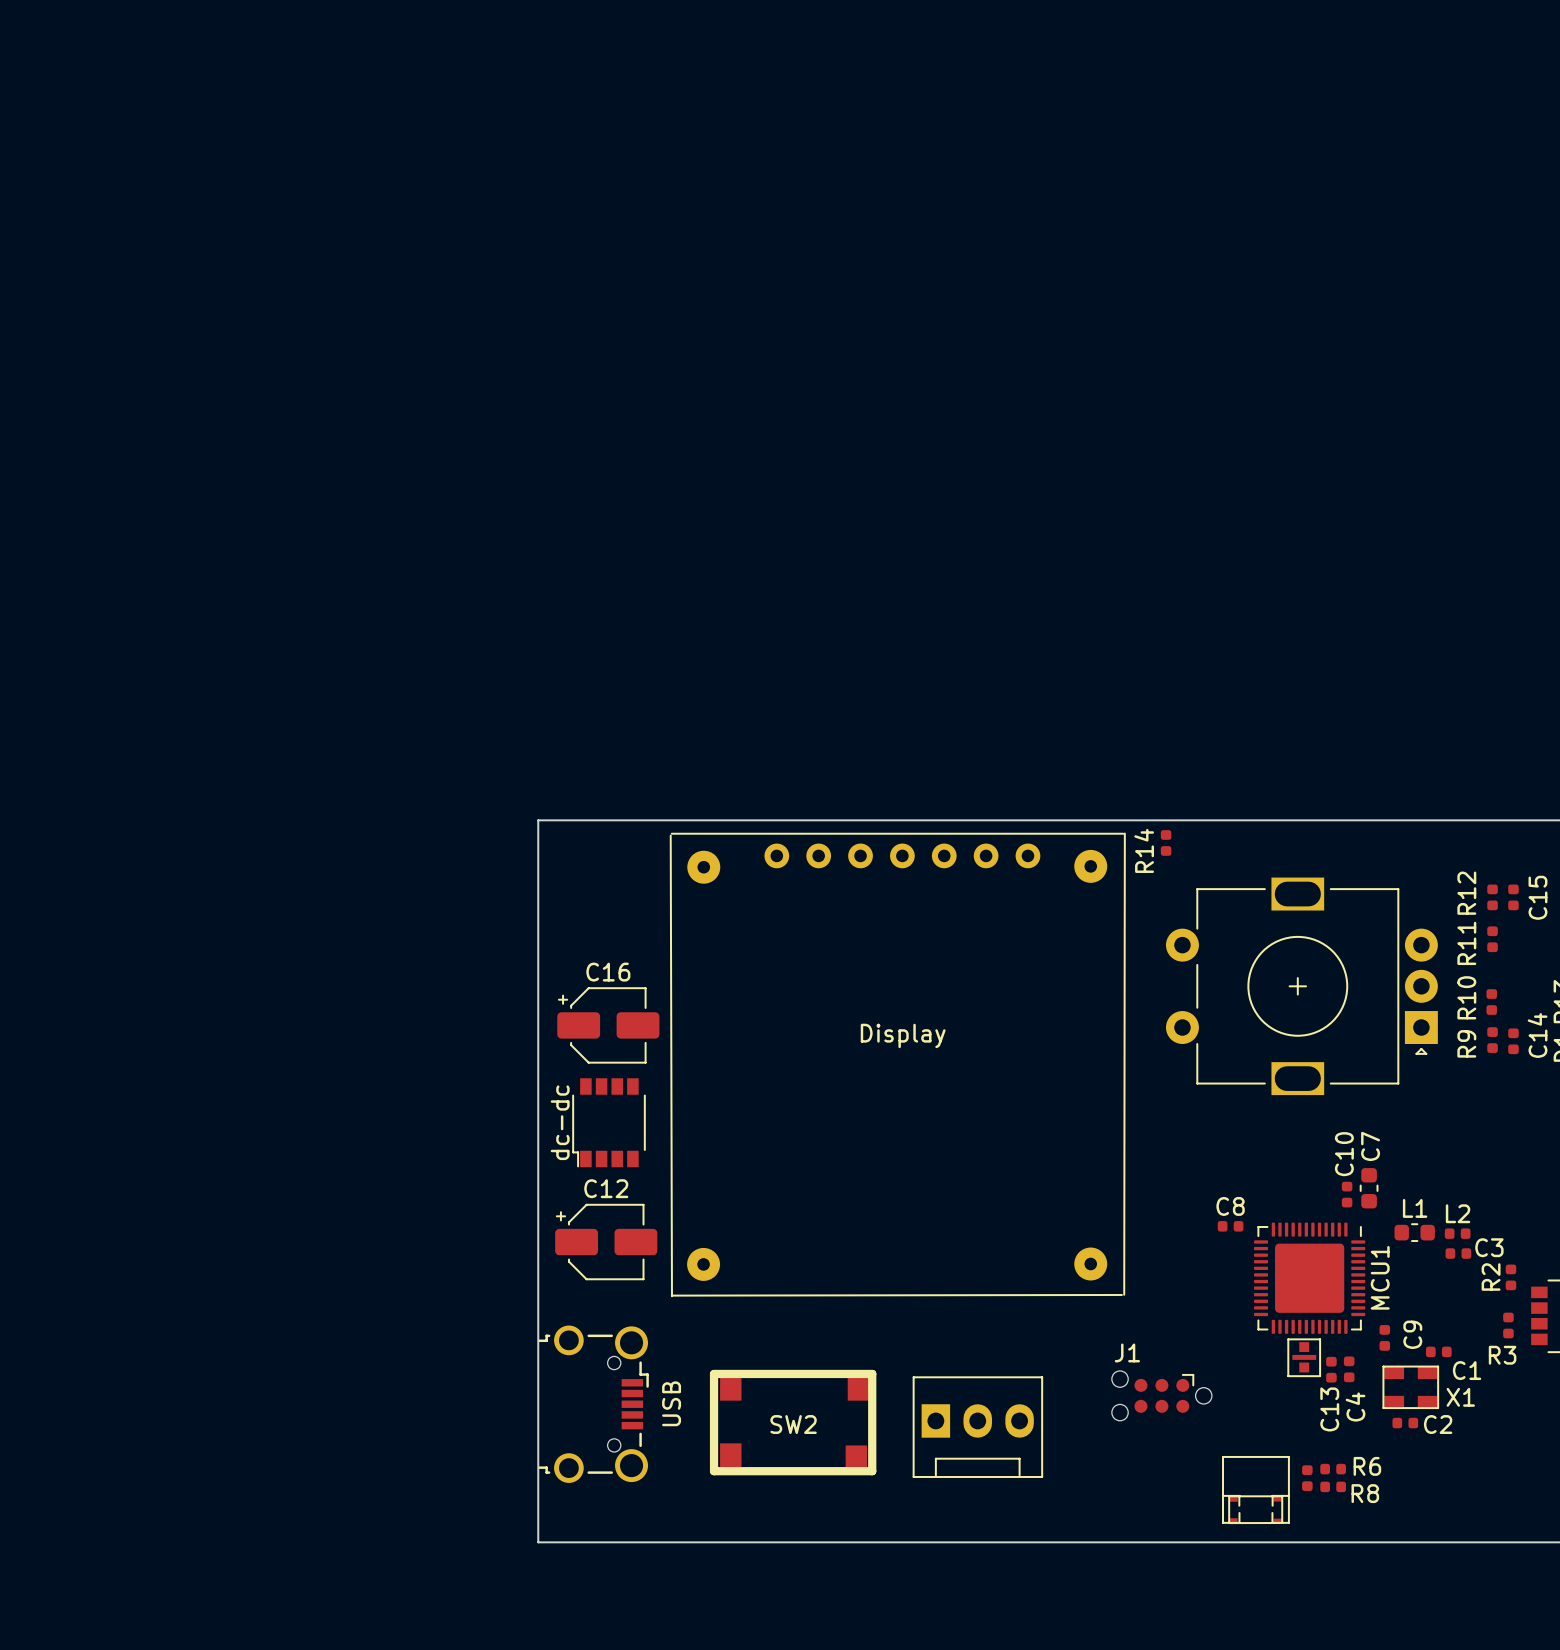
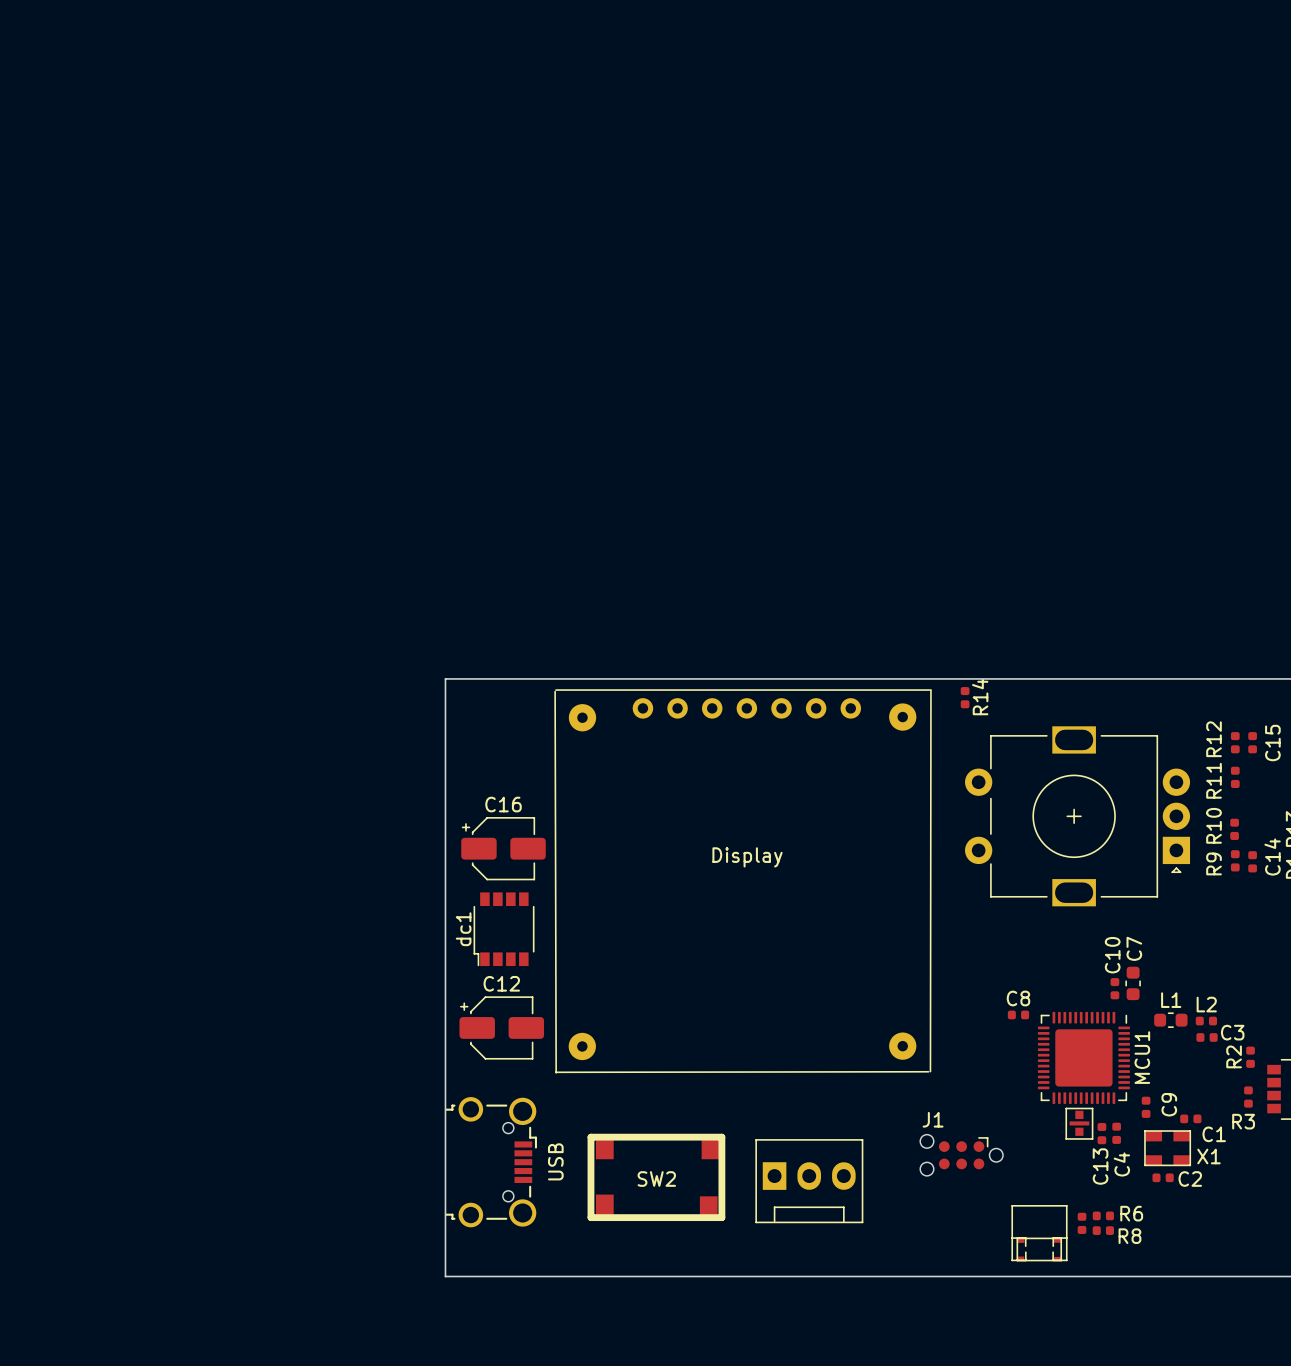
R14 name position: R14 (1144, 850) -> R14 (980, 697)
dc-dc name: dc-dc (560, 1122) -> dc1 (463, 929)

